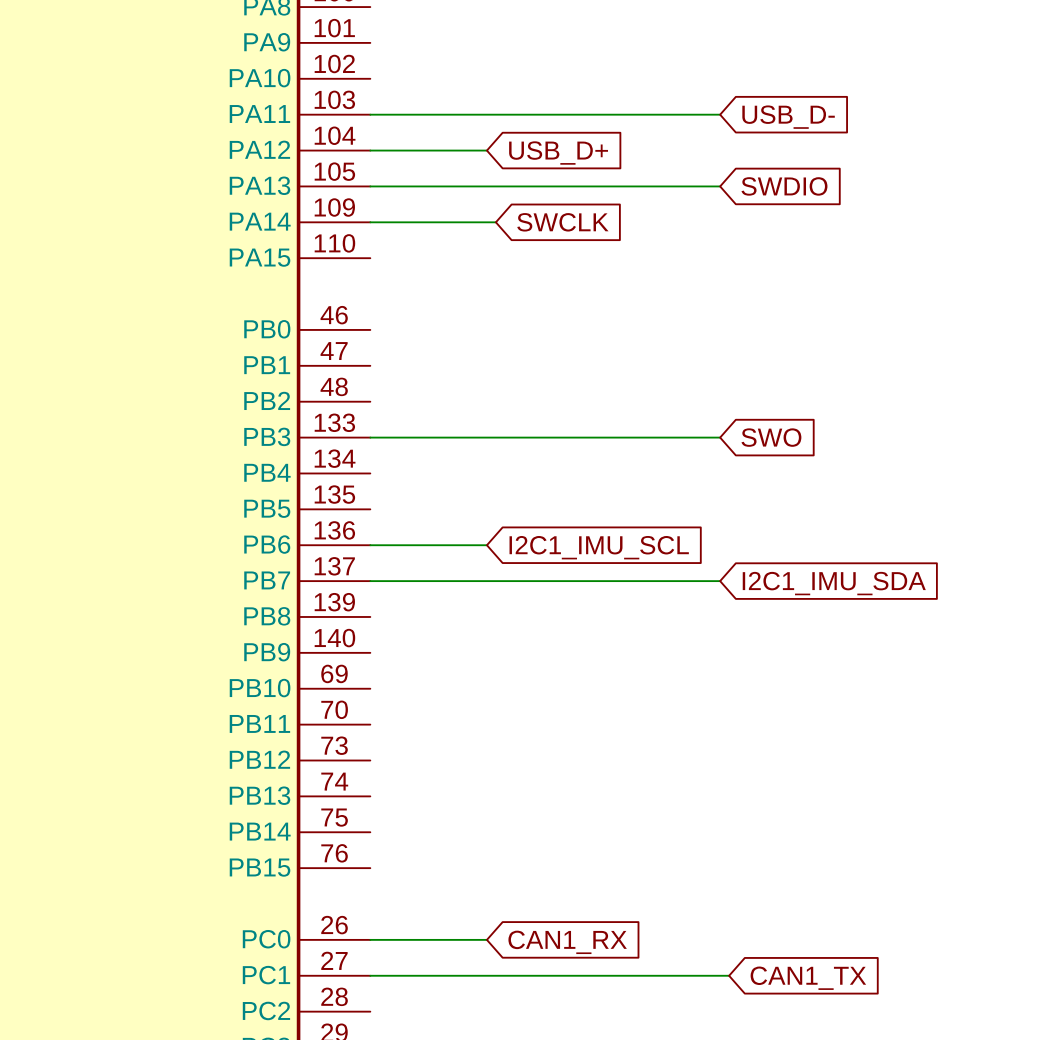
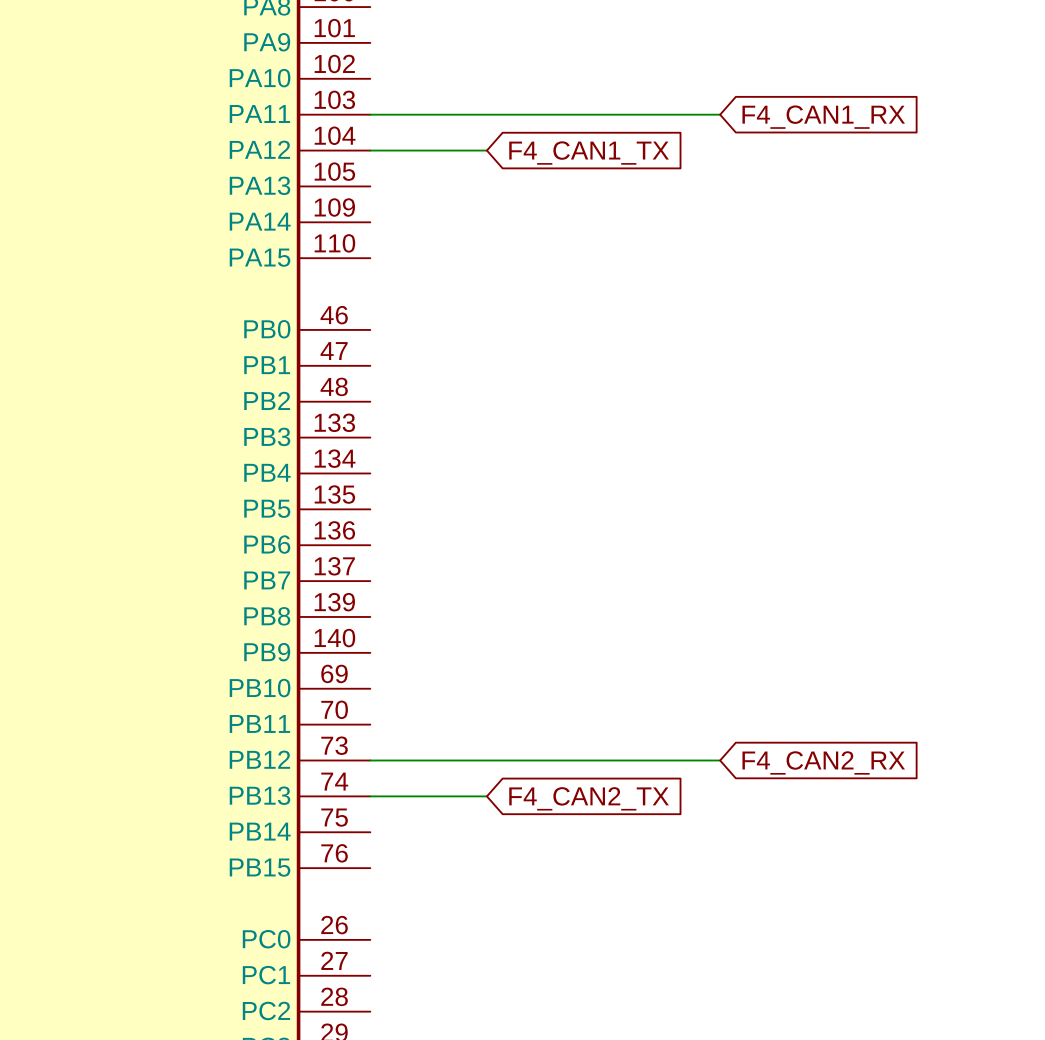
global label: USB_D- (788, 117) -> F4_CAN1_RX (823, 117)
global label: USB_D+ (558, 153) -> F4_CAN1_TX (589, 153)
wire: (370, 186) (720, 186) -> none
global label: SWDIO (784, 186) -> none
wire: (370, 222) (495, 222) -> none
global label: SWCLK (562, 222) -> none
wire: (370, 437) (720, 437) -> none
global label: SWO (771, 437) -> none
wire: (370, 545) (486, 545) -> none
global label: I2C1_IMU_SCL (599, 547) -> none
wire: (370, 581) (720, 581) -> (370, 760) (720, 760)
global label: I2C1_IMU_SDA (834, 583) -> none
global label: none -> F4_CAN2_RX (823, 762)
global label: none -> F4_CAN2_TX (589, 798)
wire: (370, 939) (486, 939) -> (370, 796) (486, 796)
global label: CAN1_RX (567, 942) -> none
wire: (370, 975) (729, 975) -> none
global label: CAN1_TX (808, 978) -> none

